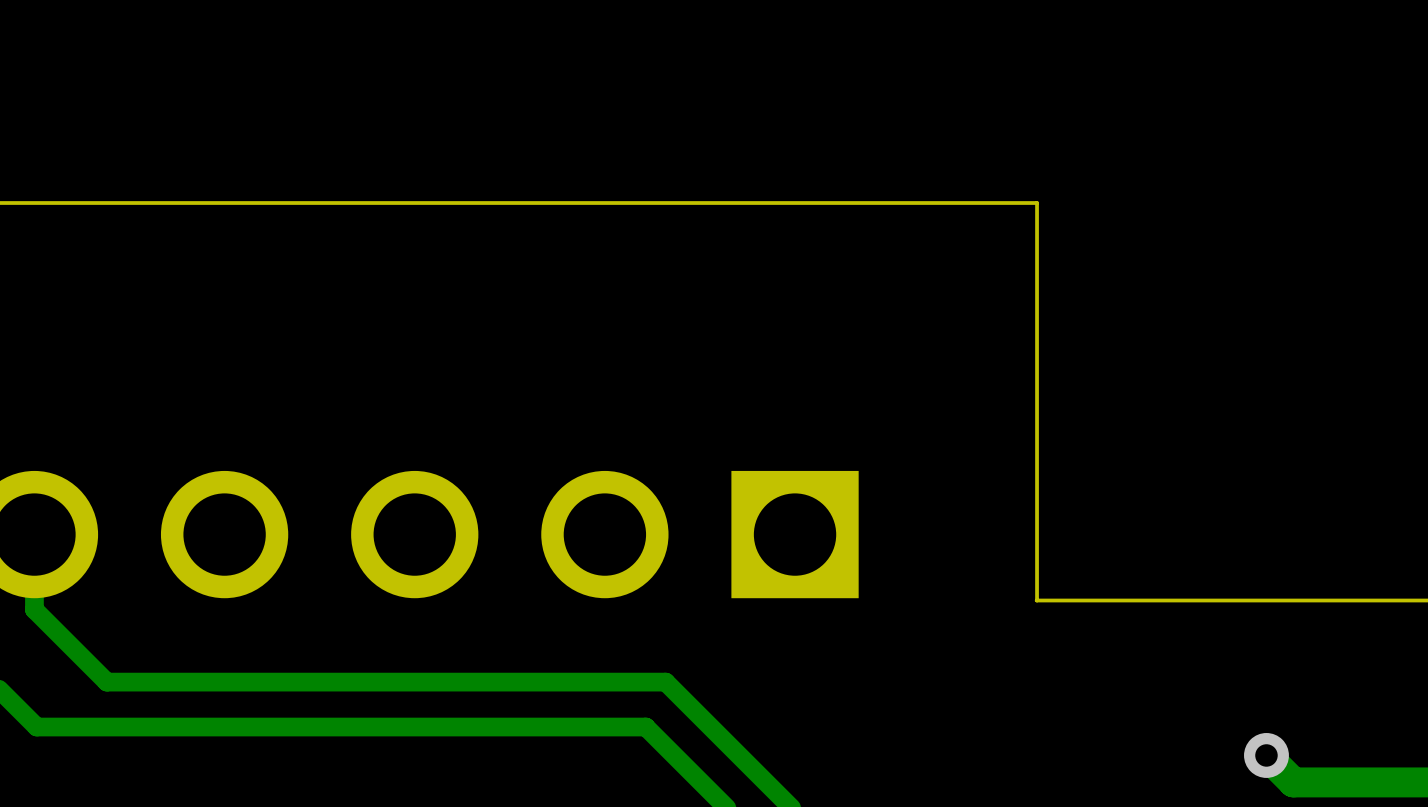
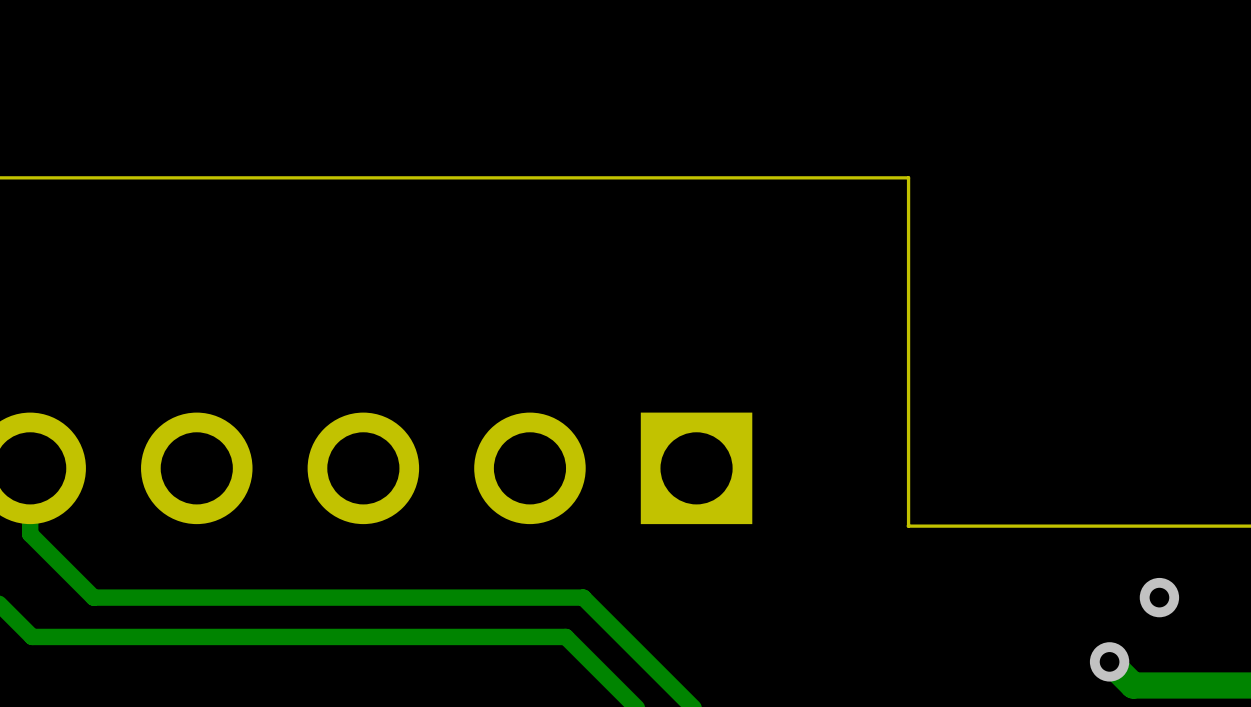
via: none -> (1159, 597)

